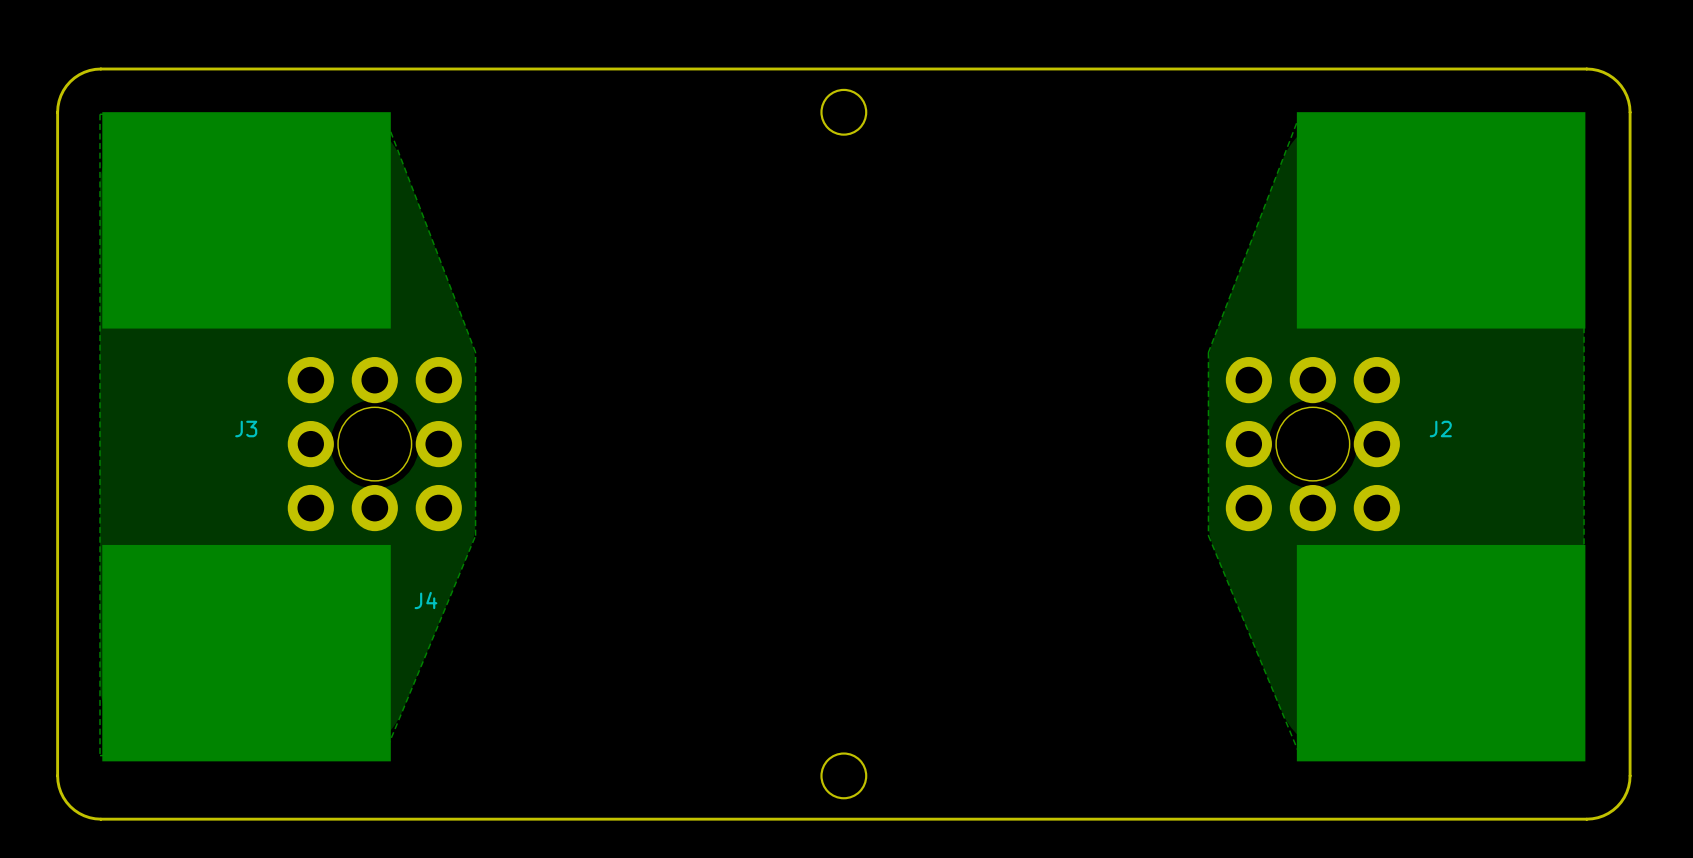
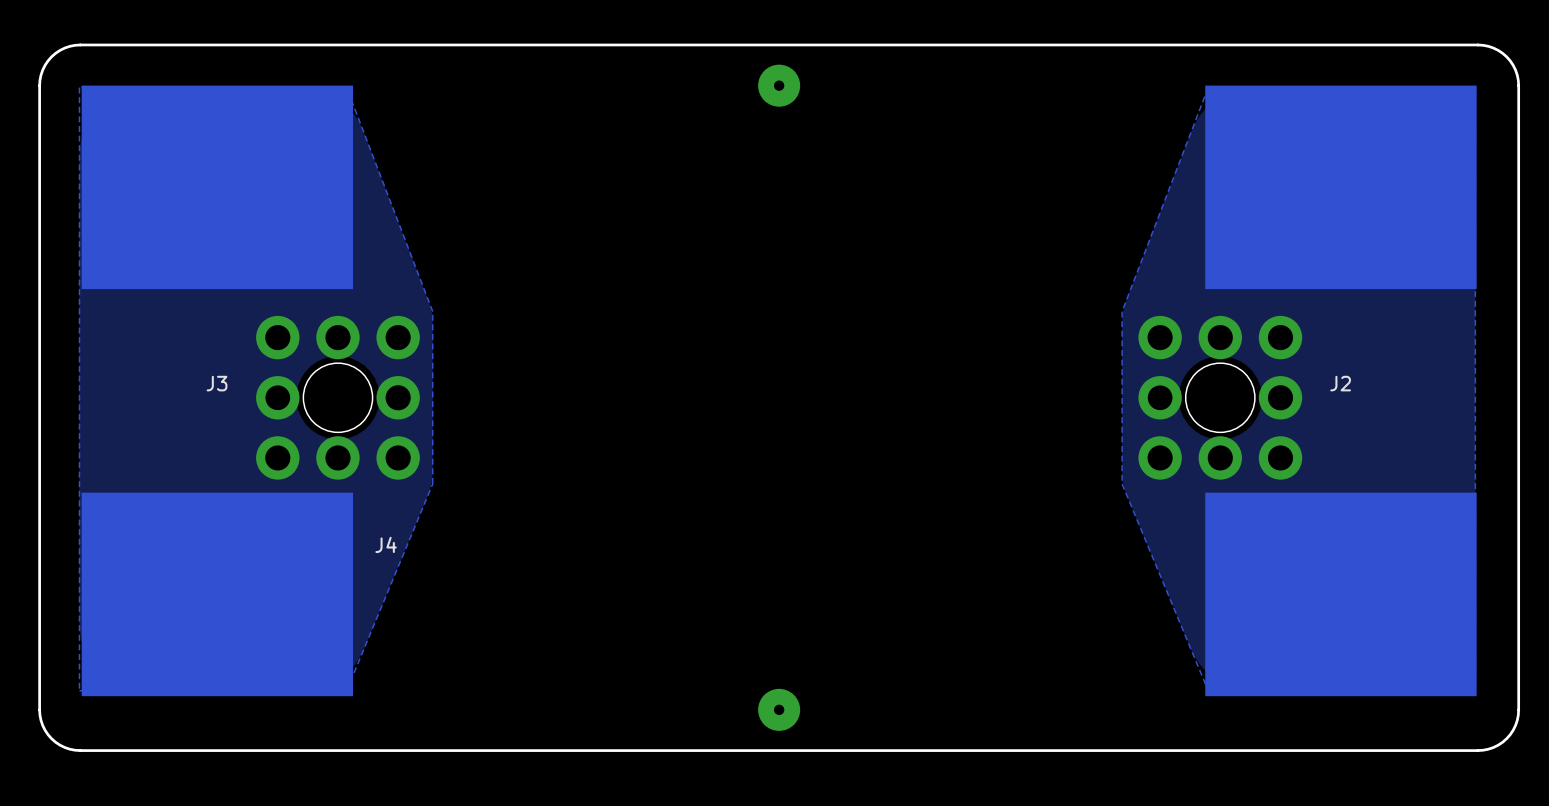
round board edge: [820, 88, 868, 136] -> none
part: none -> (779, 85)
round board edge: [820, 752, 868, 800] -> none
part: none -> (779, 709)

